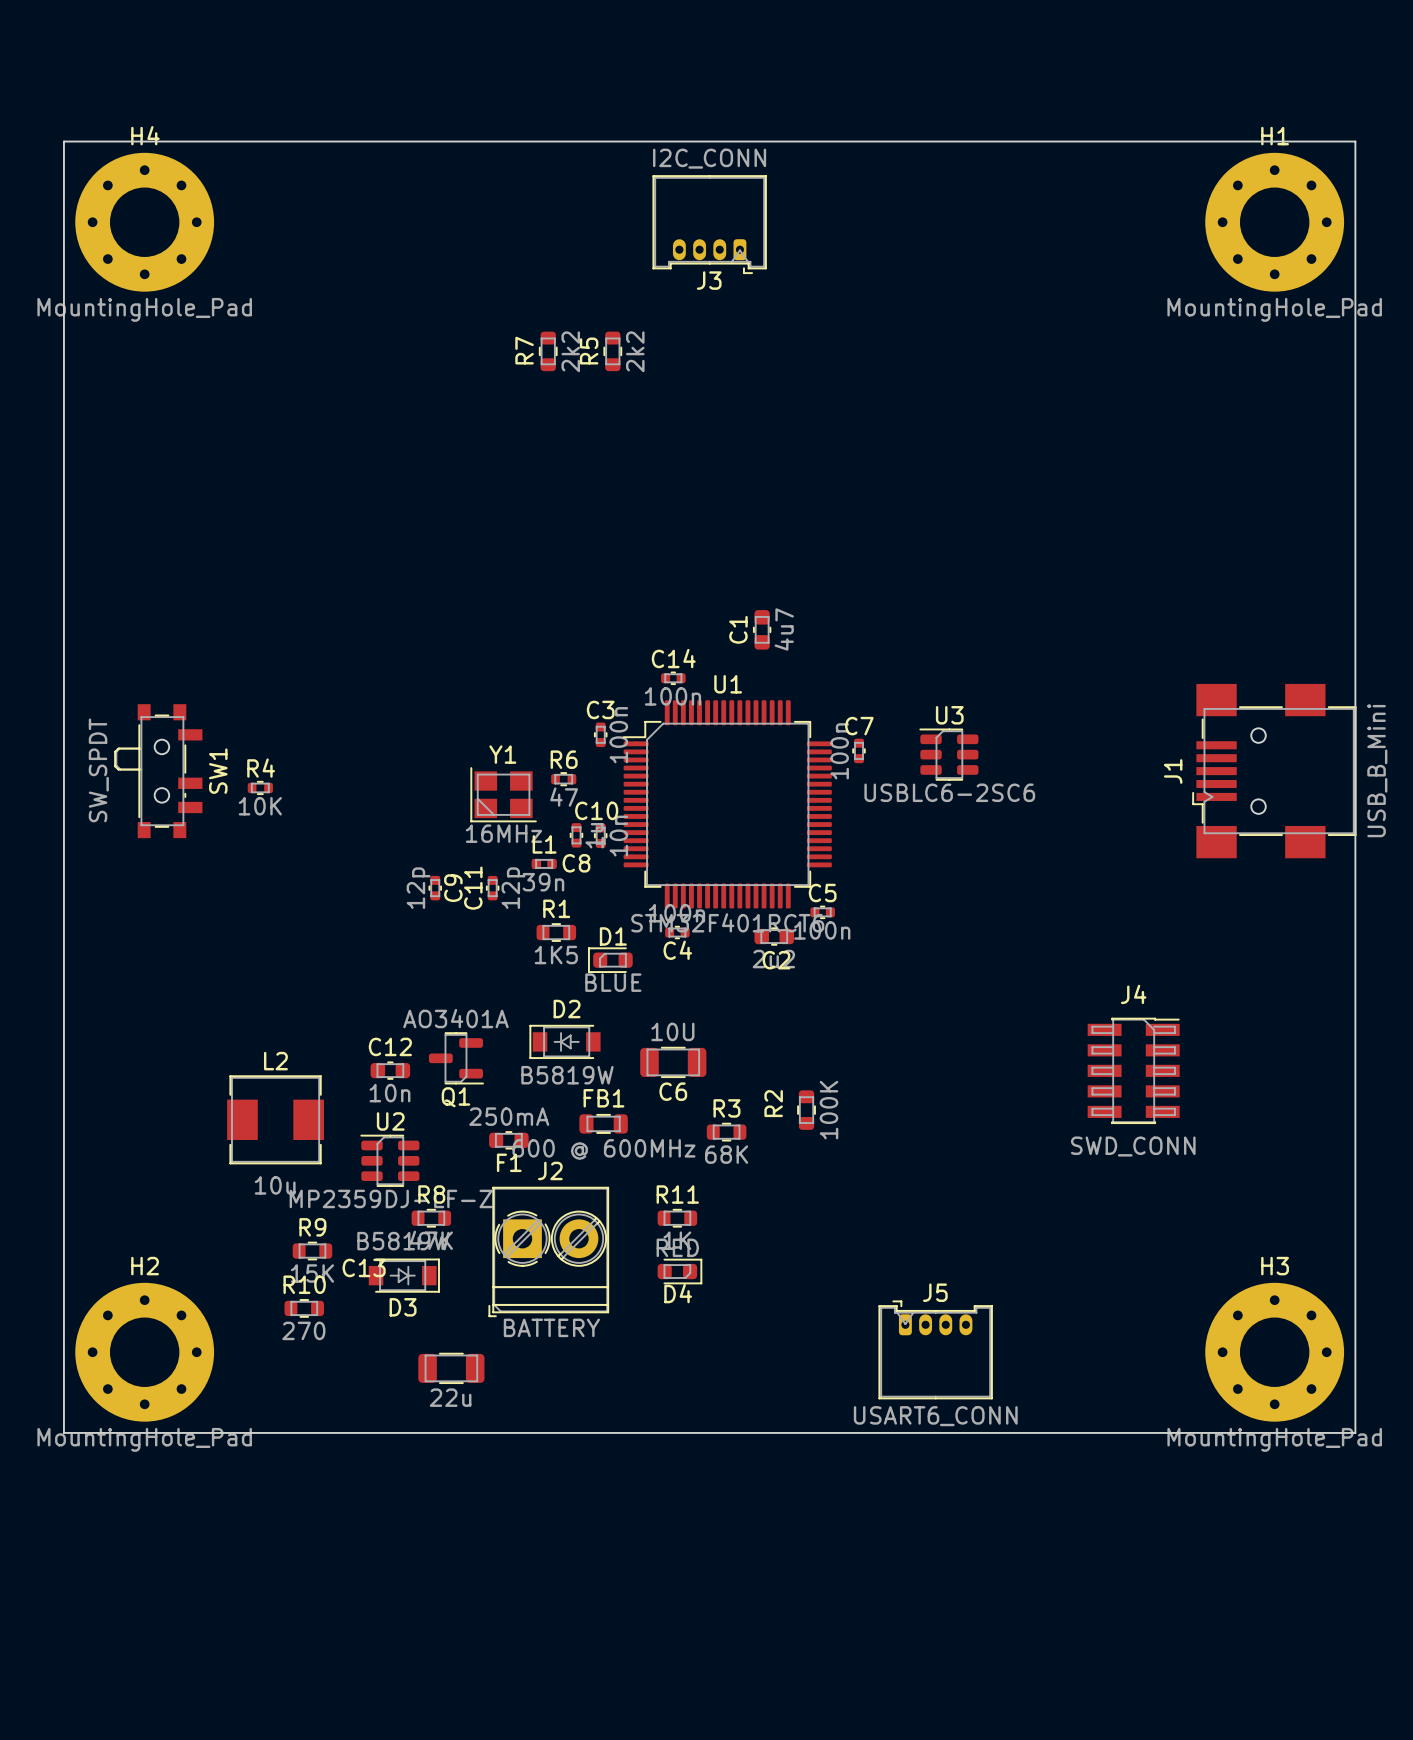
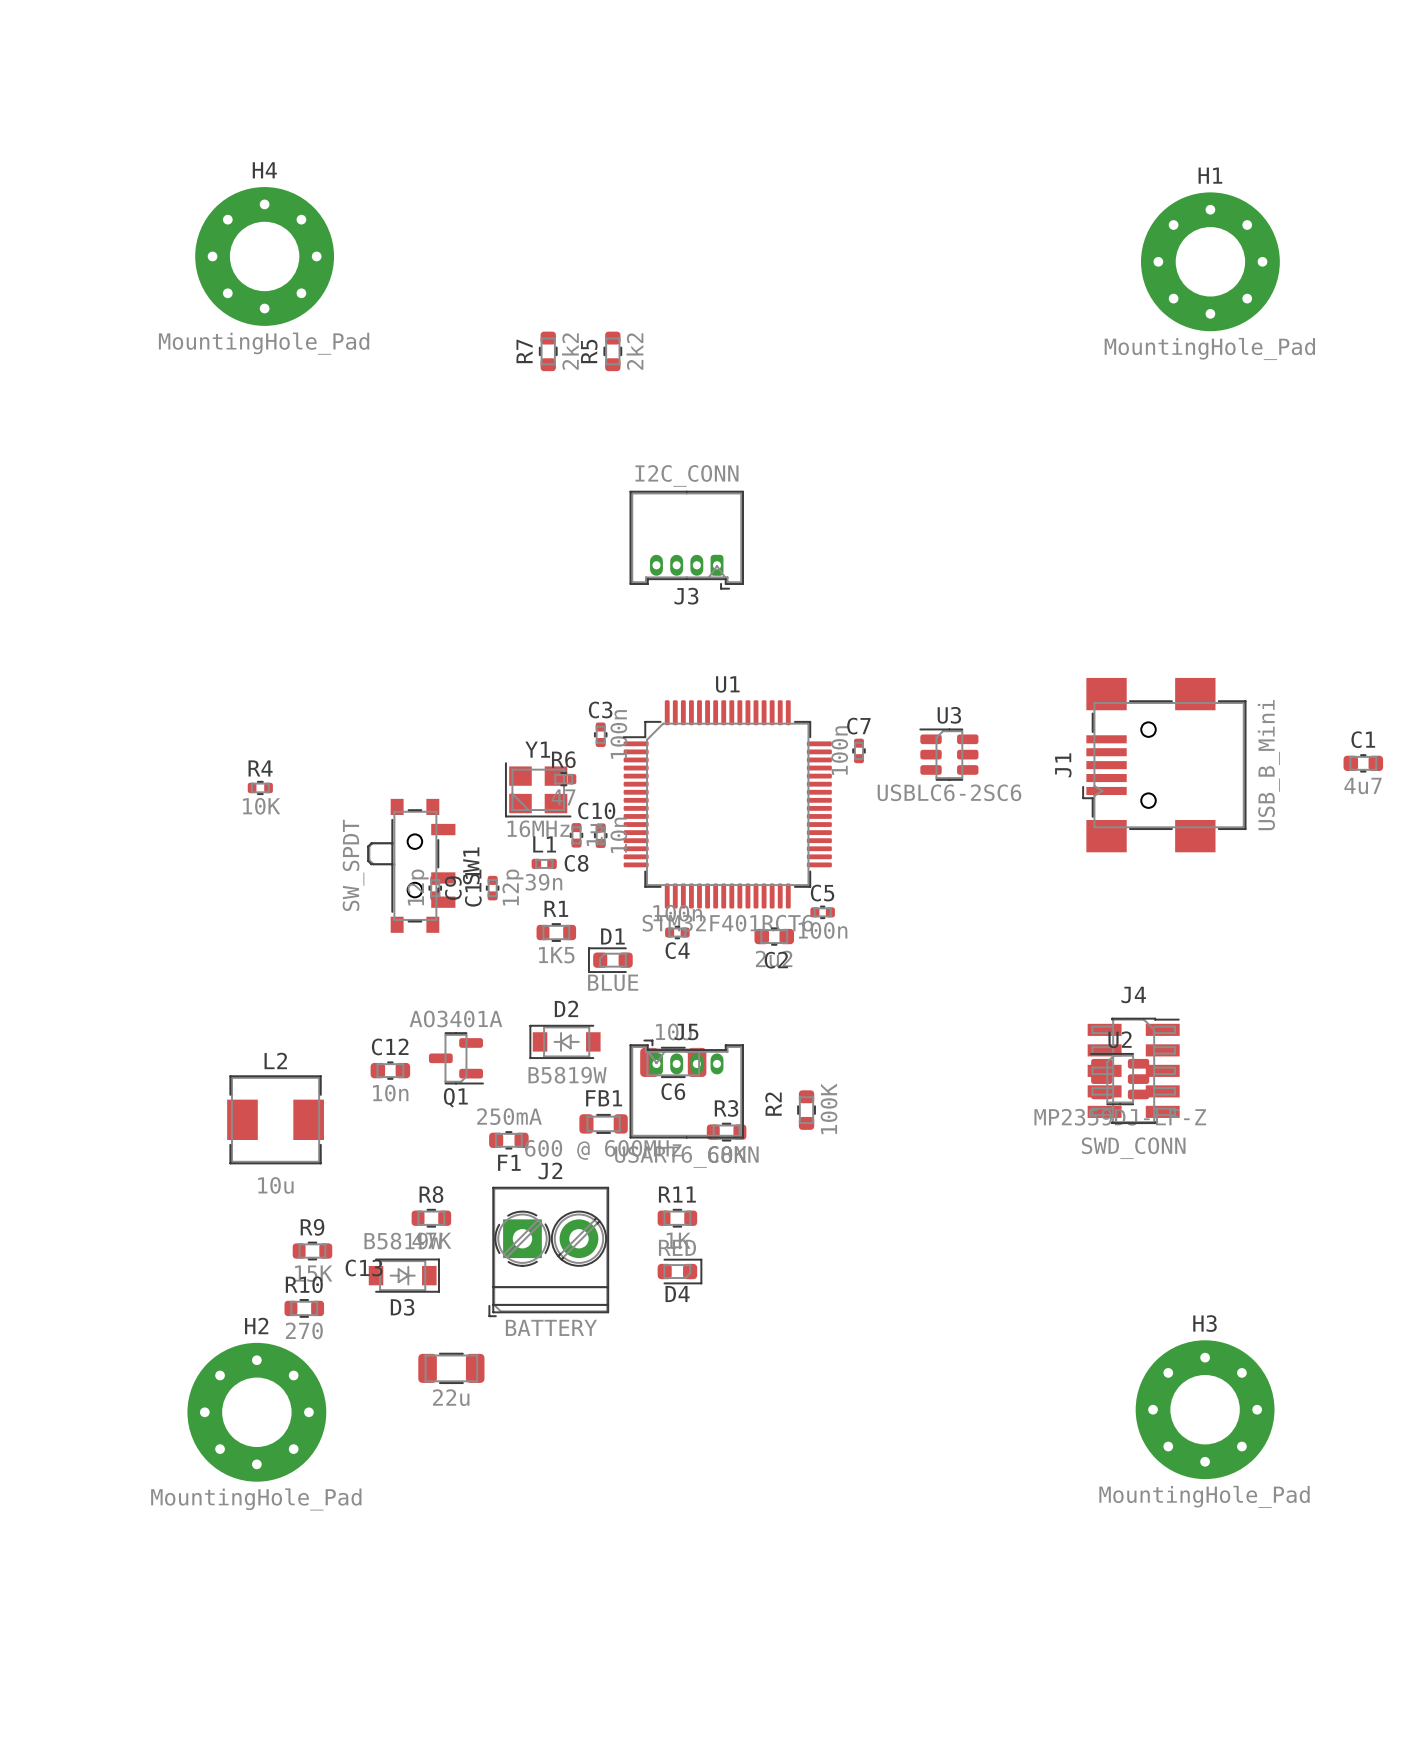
board edge: (63, 141) (1355, 141) (1355, 1432) (63, 1432) (63, 141) -> none
H4 position: (144, 222) -> (264, 256)
H1 position: (1274, 222) -> (1210, 261)
J3 position: (709, 224) -> (686, 540)
C1 rotation: 0° (762, 629) -> 90° clockwise (1363, 763)
C1 position: (762, 629) -> (1363, 763)
C14: 100n (673, 678) -> none
SW1 position: (158, 771) -> (411, 865)
J1 position: (1274, 771) -> (1164, 765)
Y1 position: (503, 794) -> (538, 789)
U2 position: (389, 1160) -> (1119, 1079)
J5 position: (935, 1349) -> (686, 1089)
H2 position: (144, 1352) -> (256, 1412)
H3 position: (1274, 1352) -> (1205, 1409)

